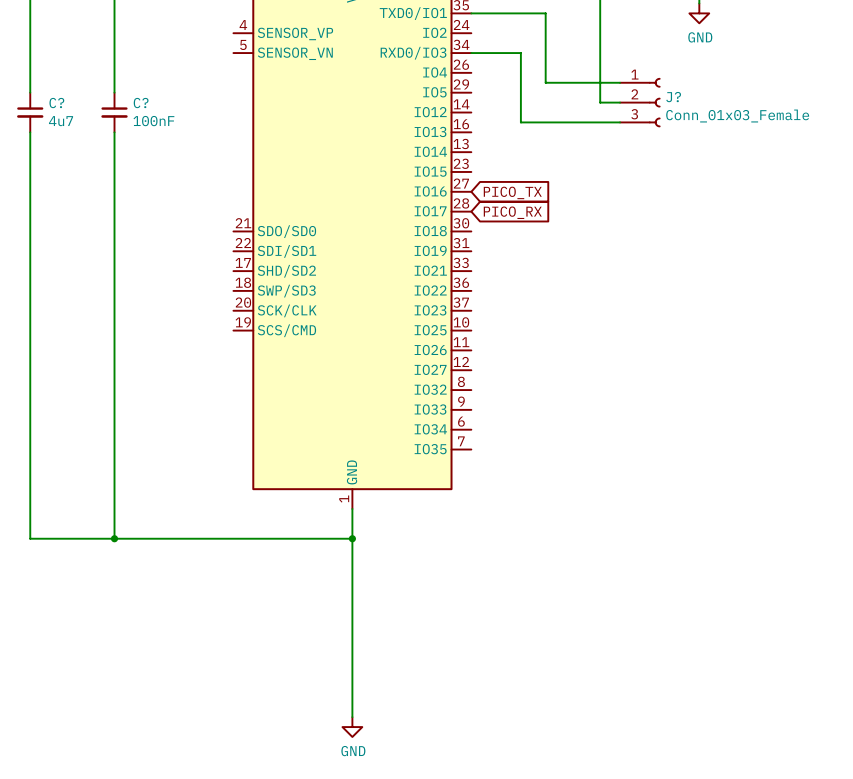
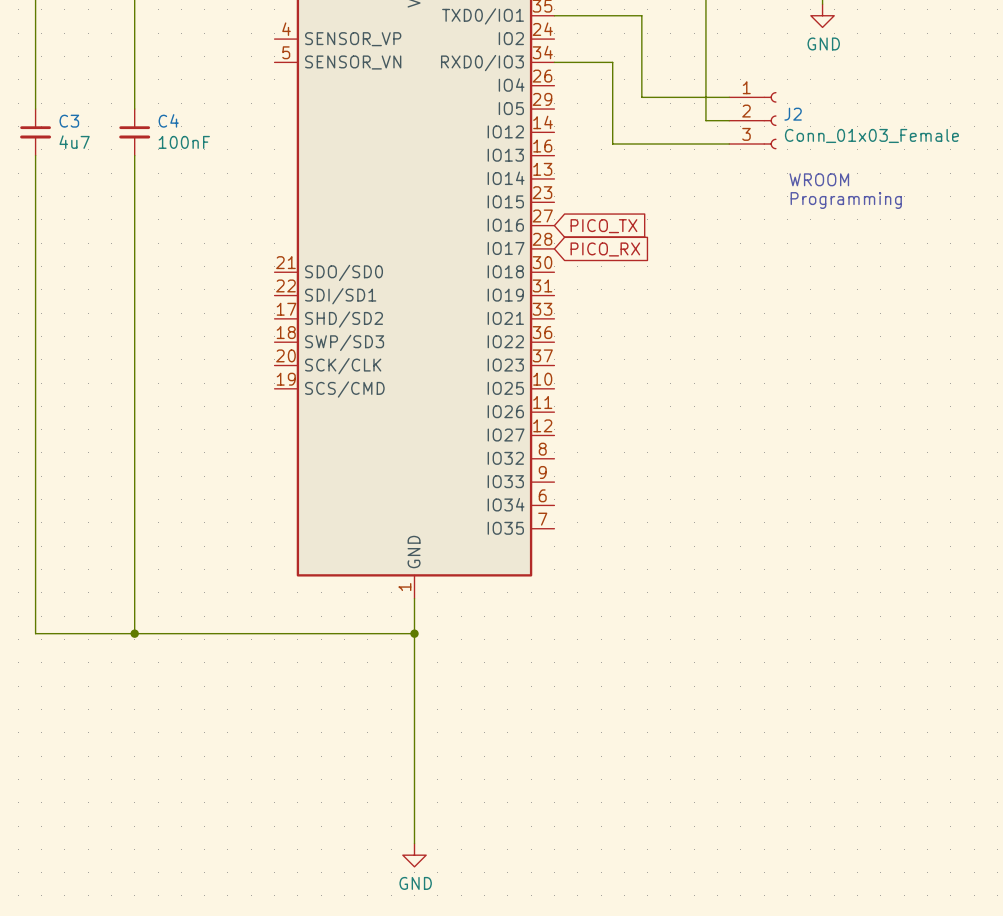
J? name: J? (673, 97) -> J2 (793, 114)
C? name: C? (56, 103) -> C3 (69, 121)
C? name: C? (141, 103) -> C4 (168, 120)
text: none -> WROOM (819, 179)
text: none -> Programming (846, 200)

